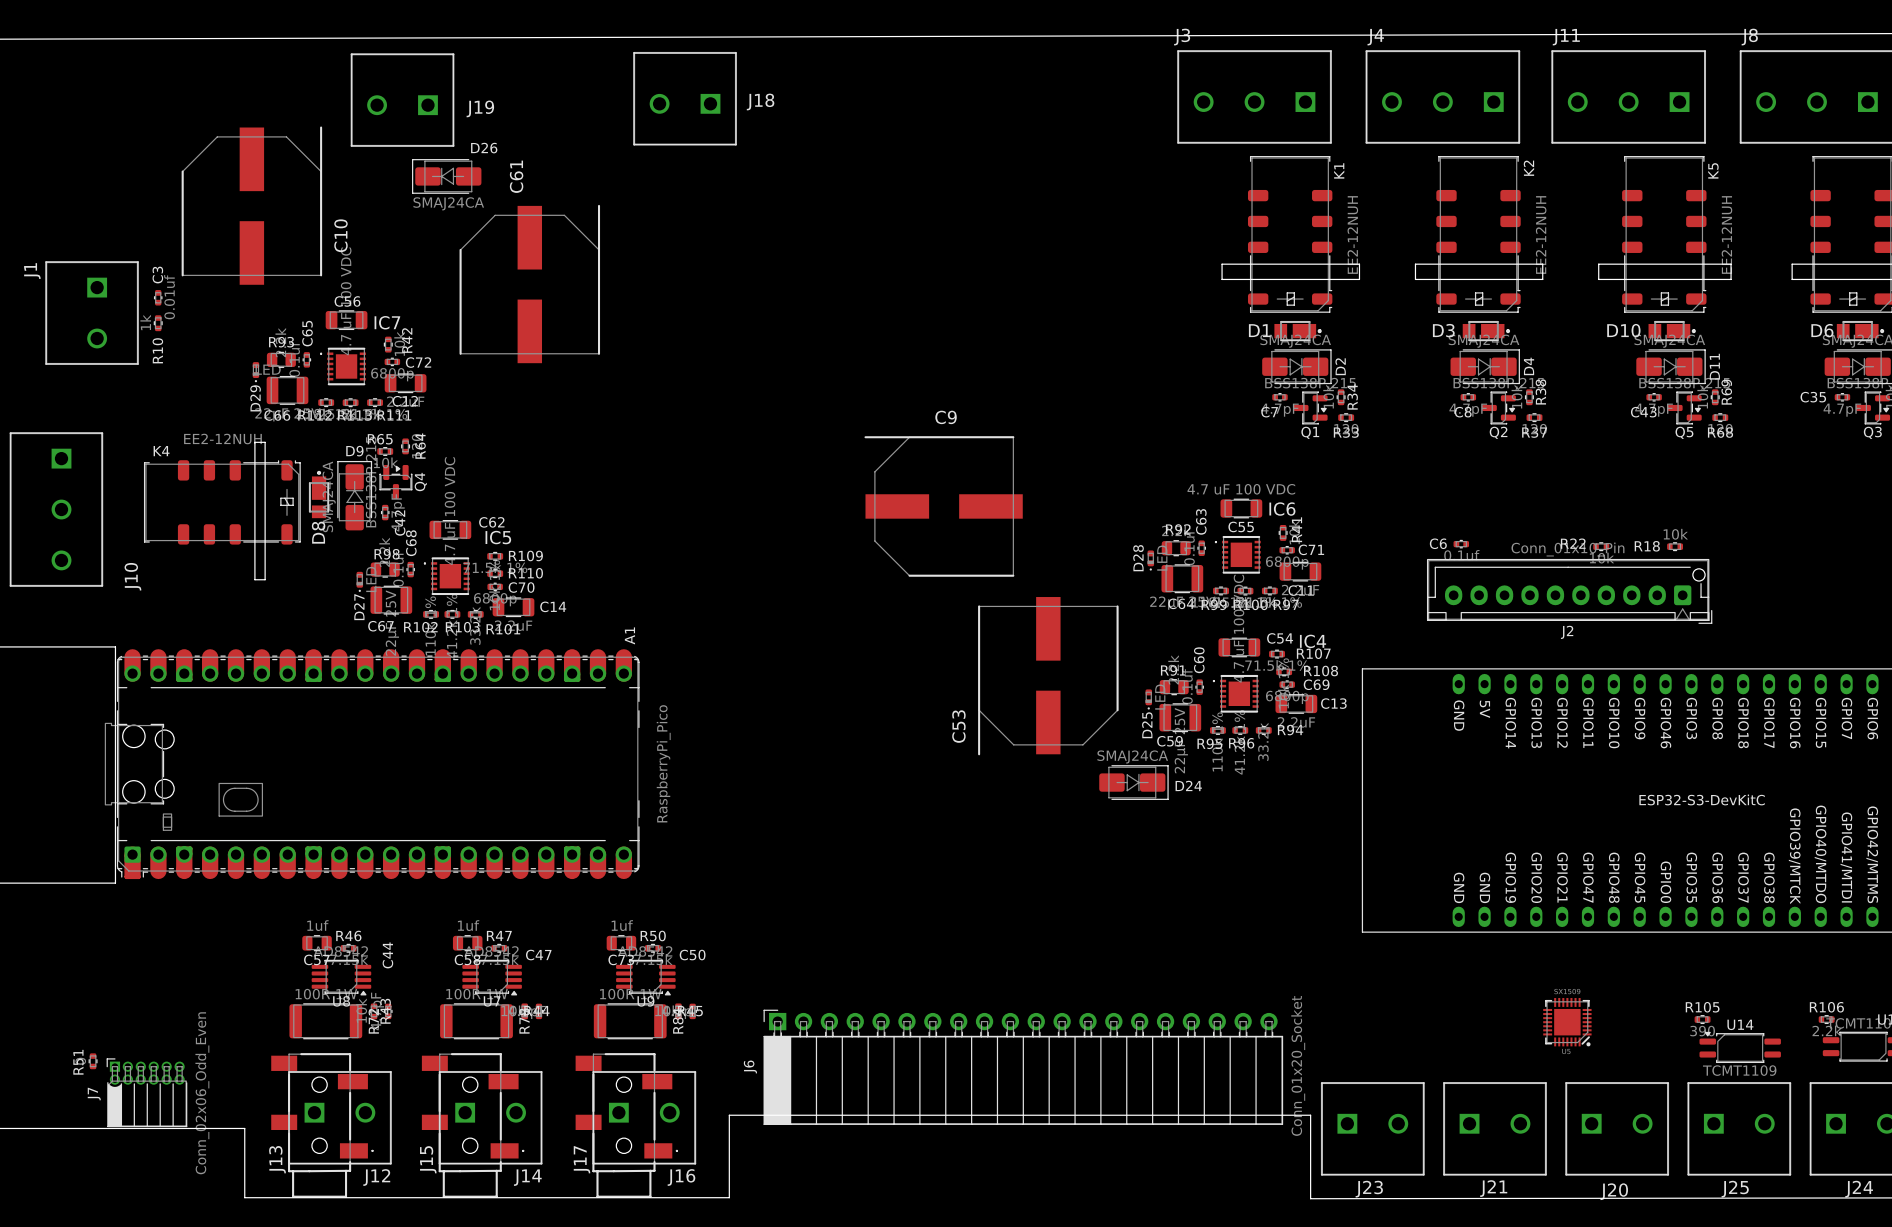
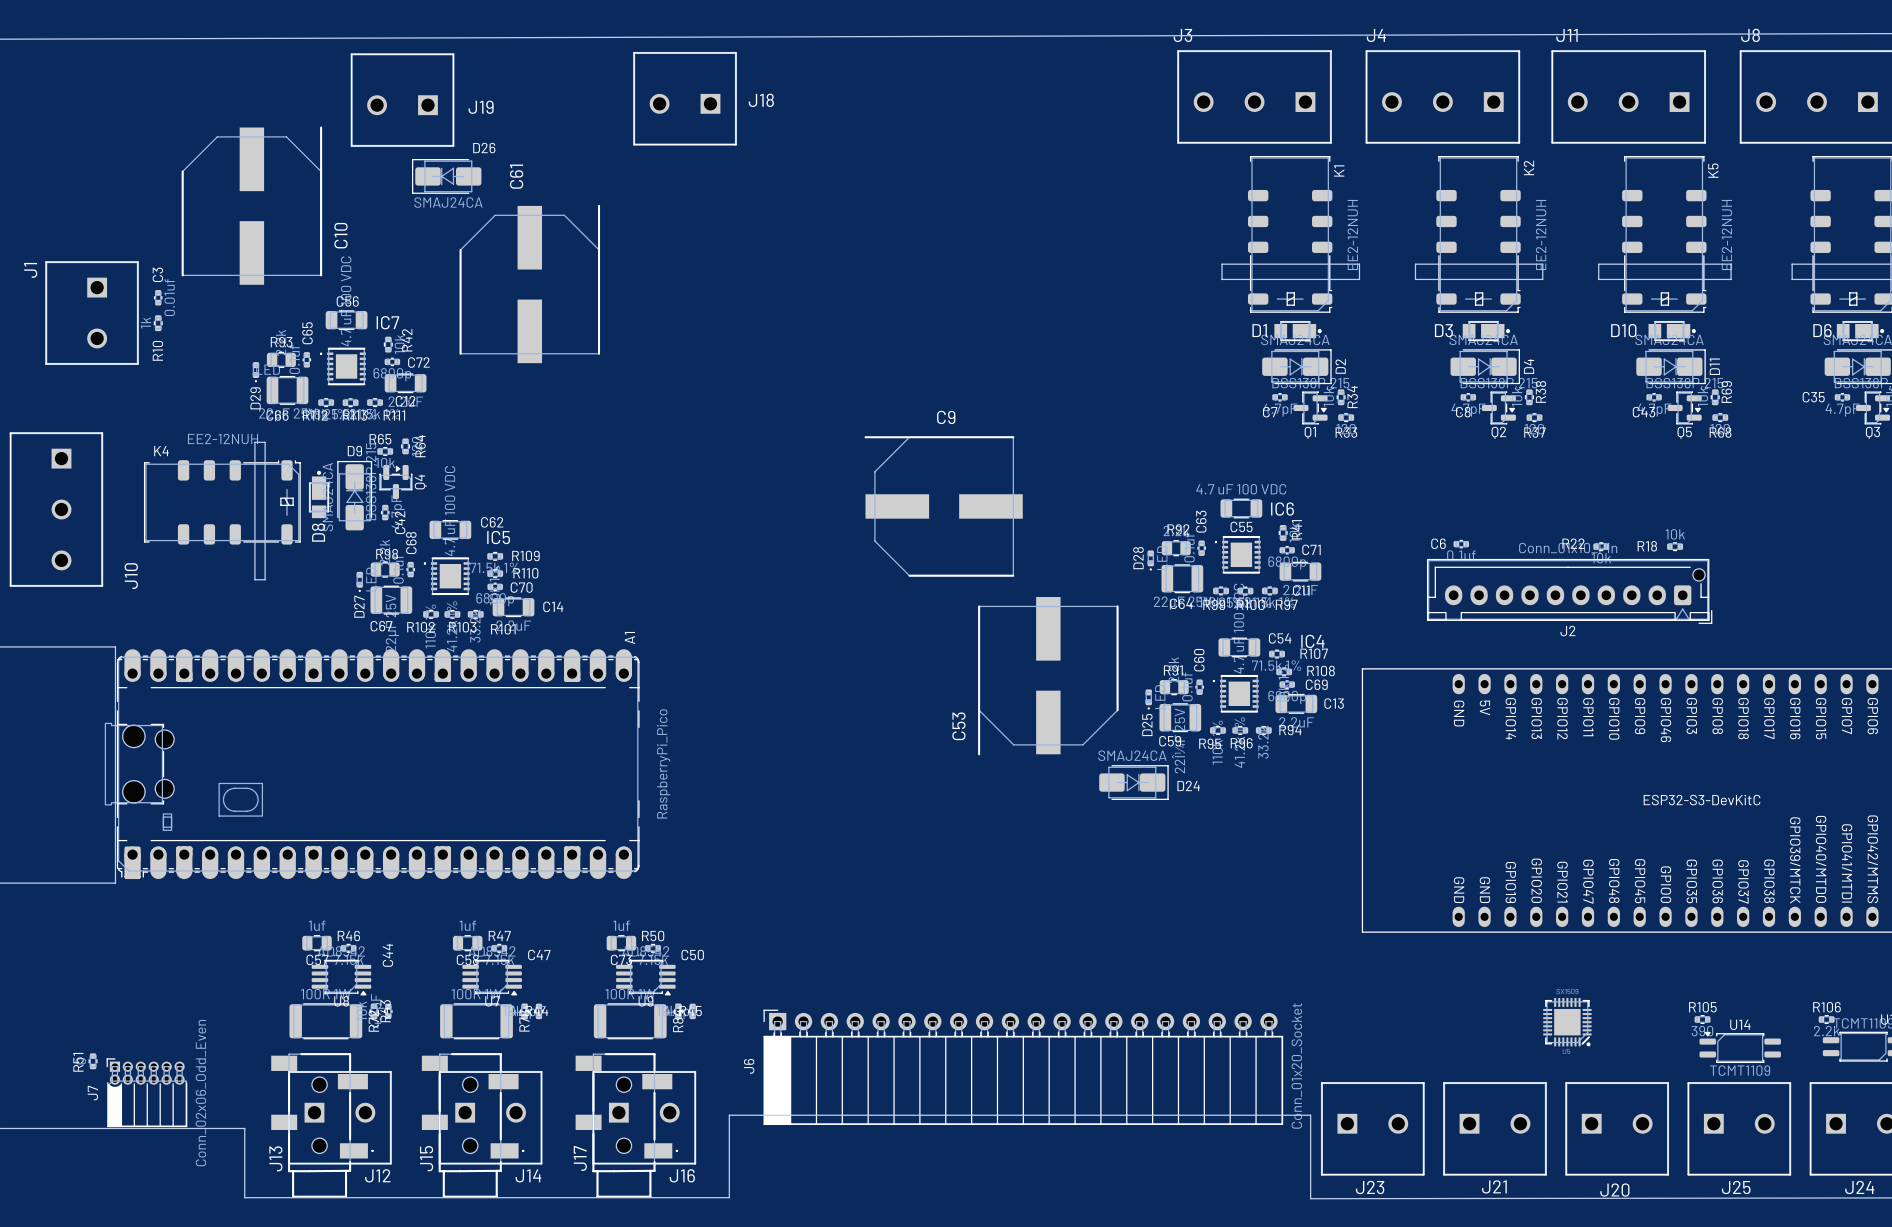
C59 value: 22μF 25V (1181, 740) -> 22Î¼F 25V (1178, 740)

